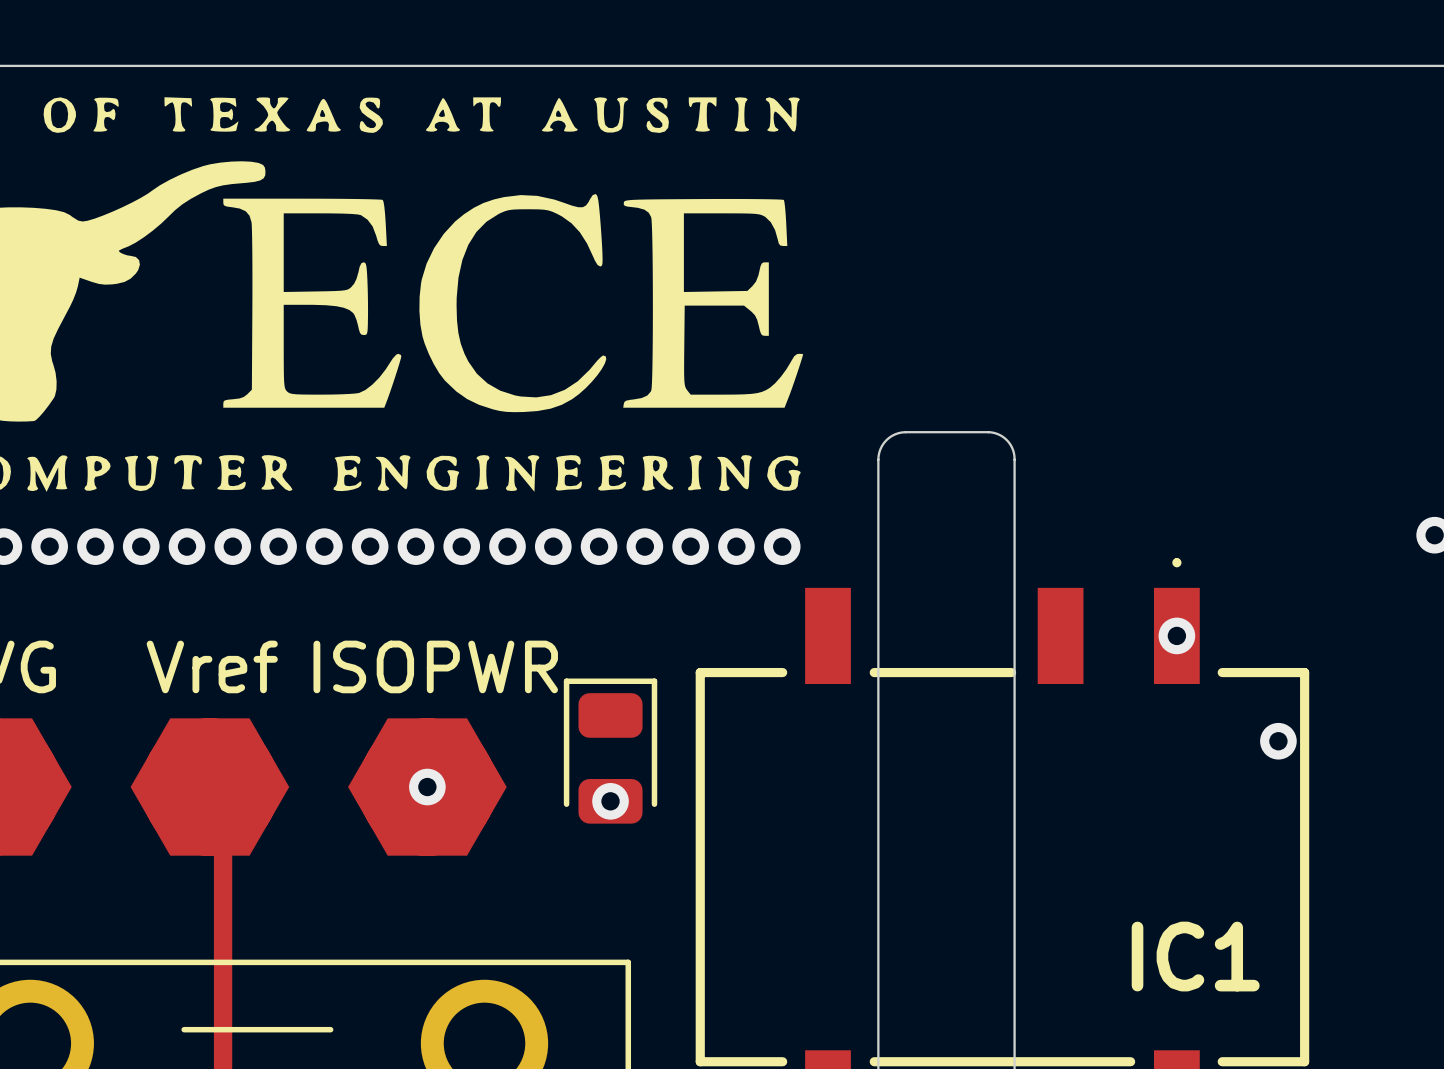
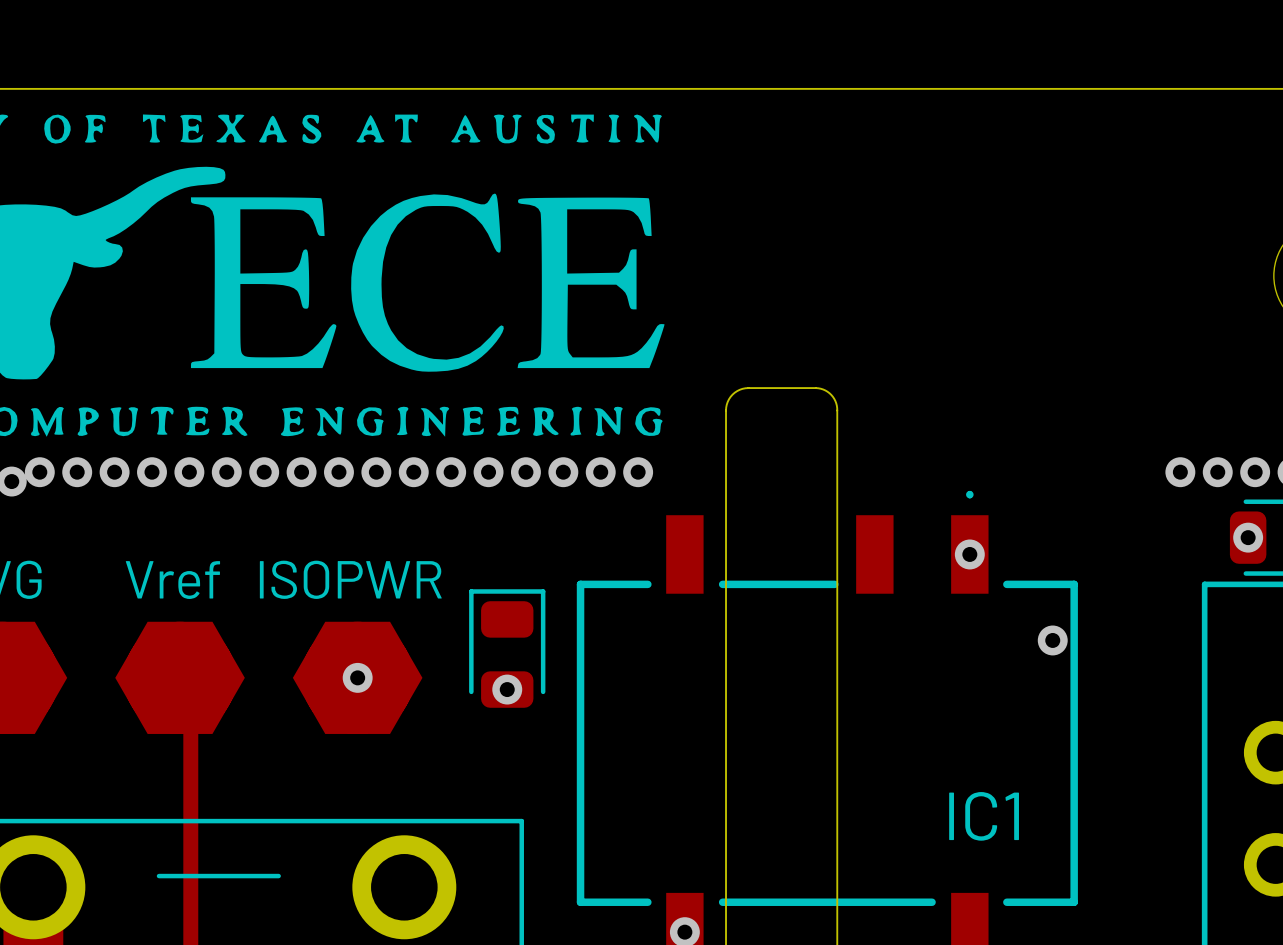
via position: (49, 546) -> (39, 472)
via position: (95, 546) -> (77, 472)
via position: (141, 546) -> (114, 472)
via position: (187, 546) -> (151, 472)
via position: (232, 546) -> (189, 472)
via position: (278, 546) -> (226, 472)
via position: (324, 546) -> (264, 472)
via position: (370, 546) -> (301, 472)
via position: (415, 546) -> (338, 472)
via position: (461, 546) -> (376, 472)
via position: (507, 546) -> (413, 472)
via position: (553, 546) -> (451, 472)
via position: (599, 546) -> (488, 472)
via position: (644, 546) -> (525, 472)
via position: (690, 546) -> (563, 472)
via position: (736, 546) -> (600, 472)
via position: (782, 546) -> (638, 472)

